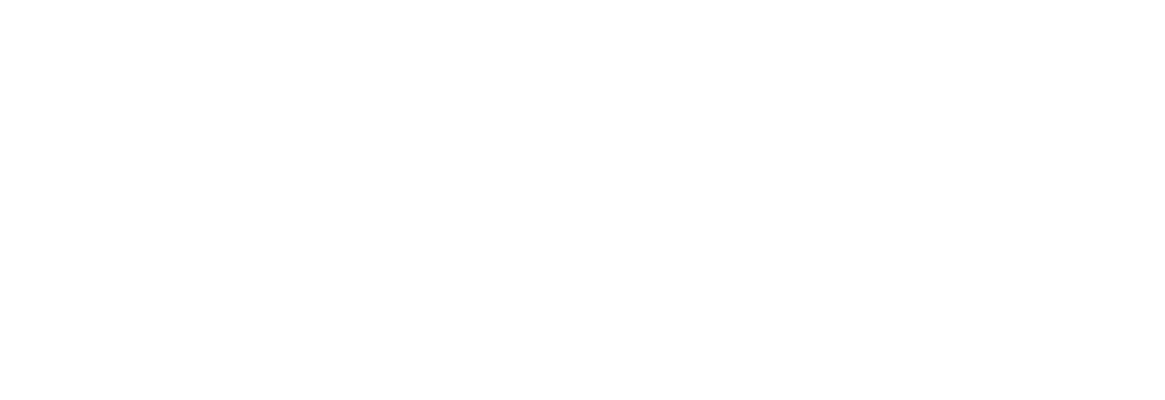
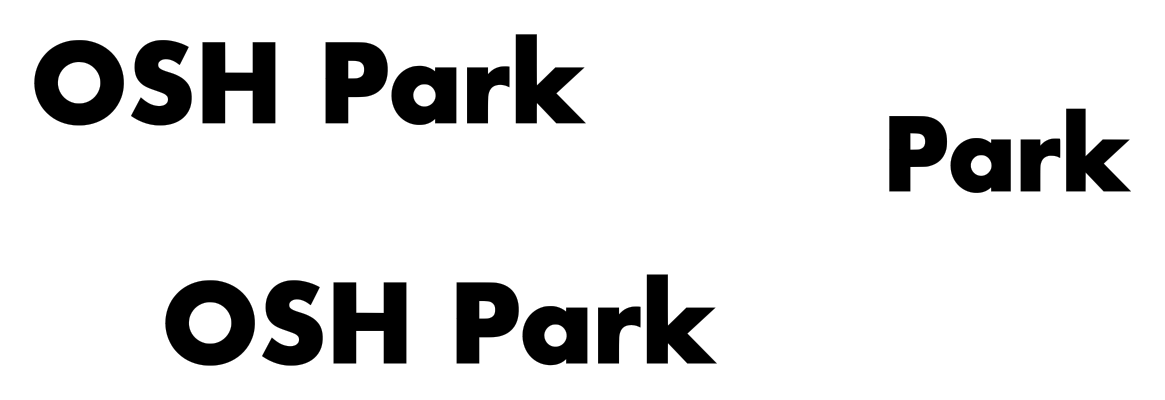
drawing: none -> [34, 34, 586, 126]
drawing: none -> [889, 108, 1131, 193]
drawing: none -> [165, 274, 717, 366]

